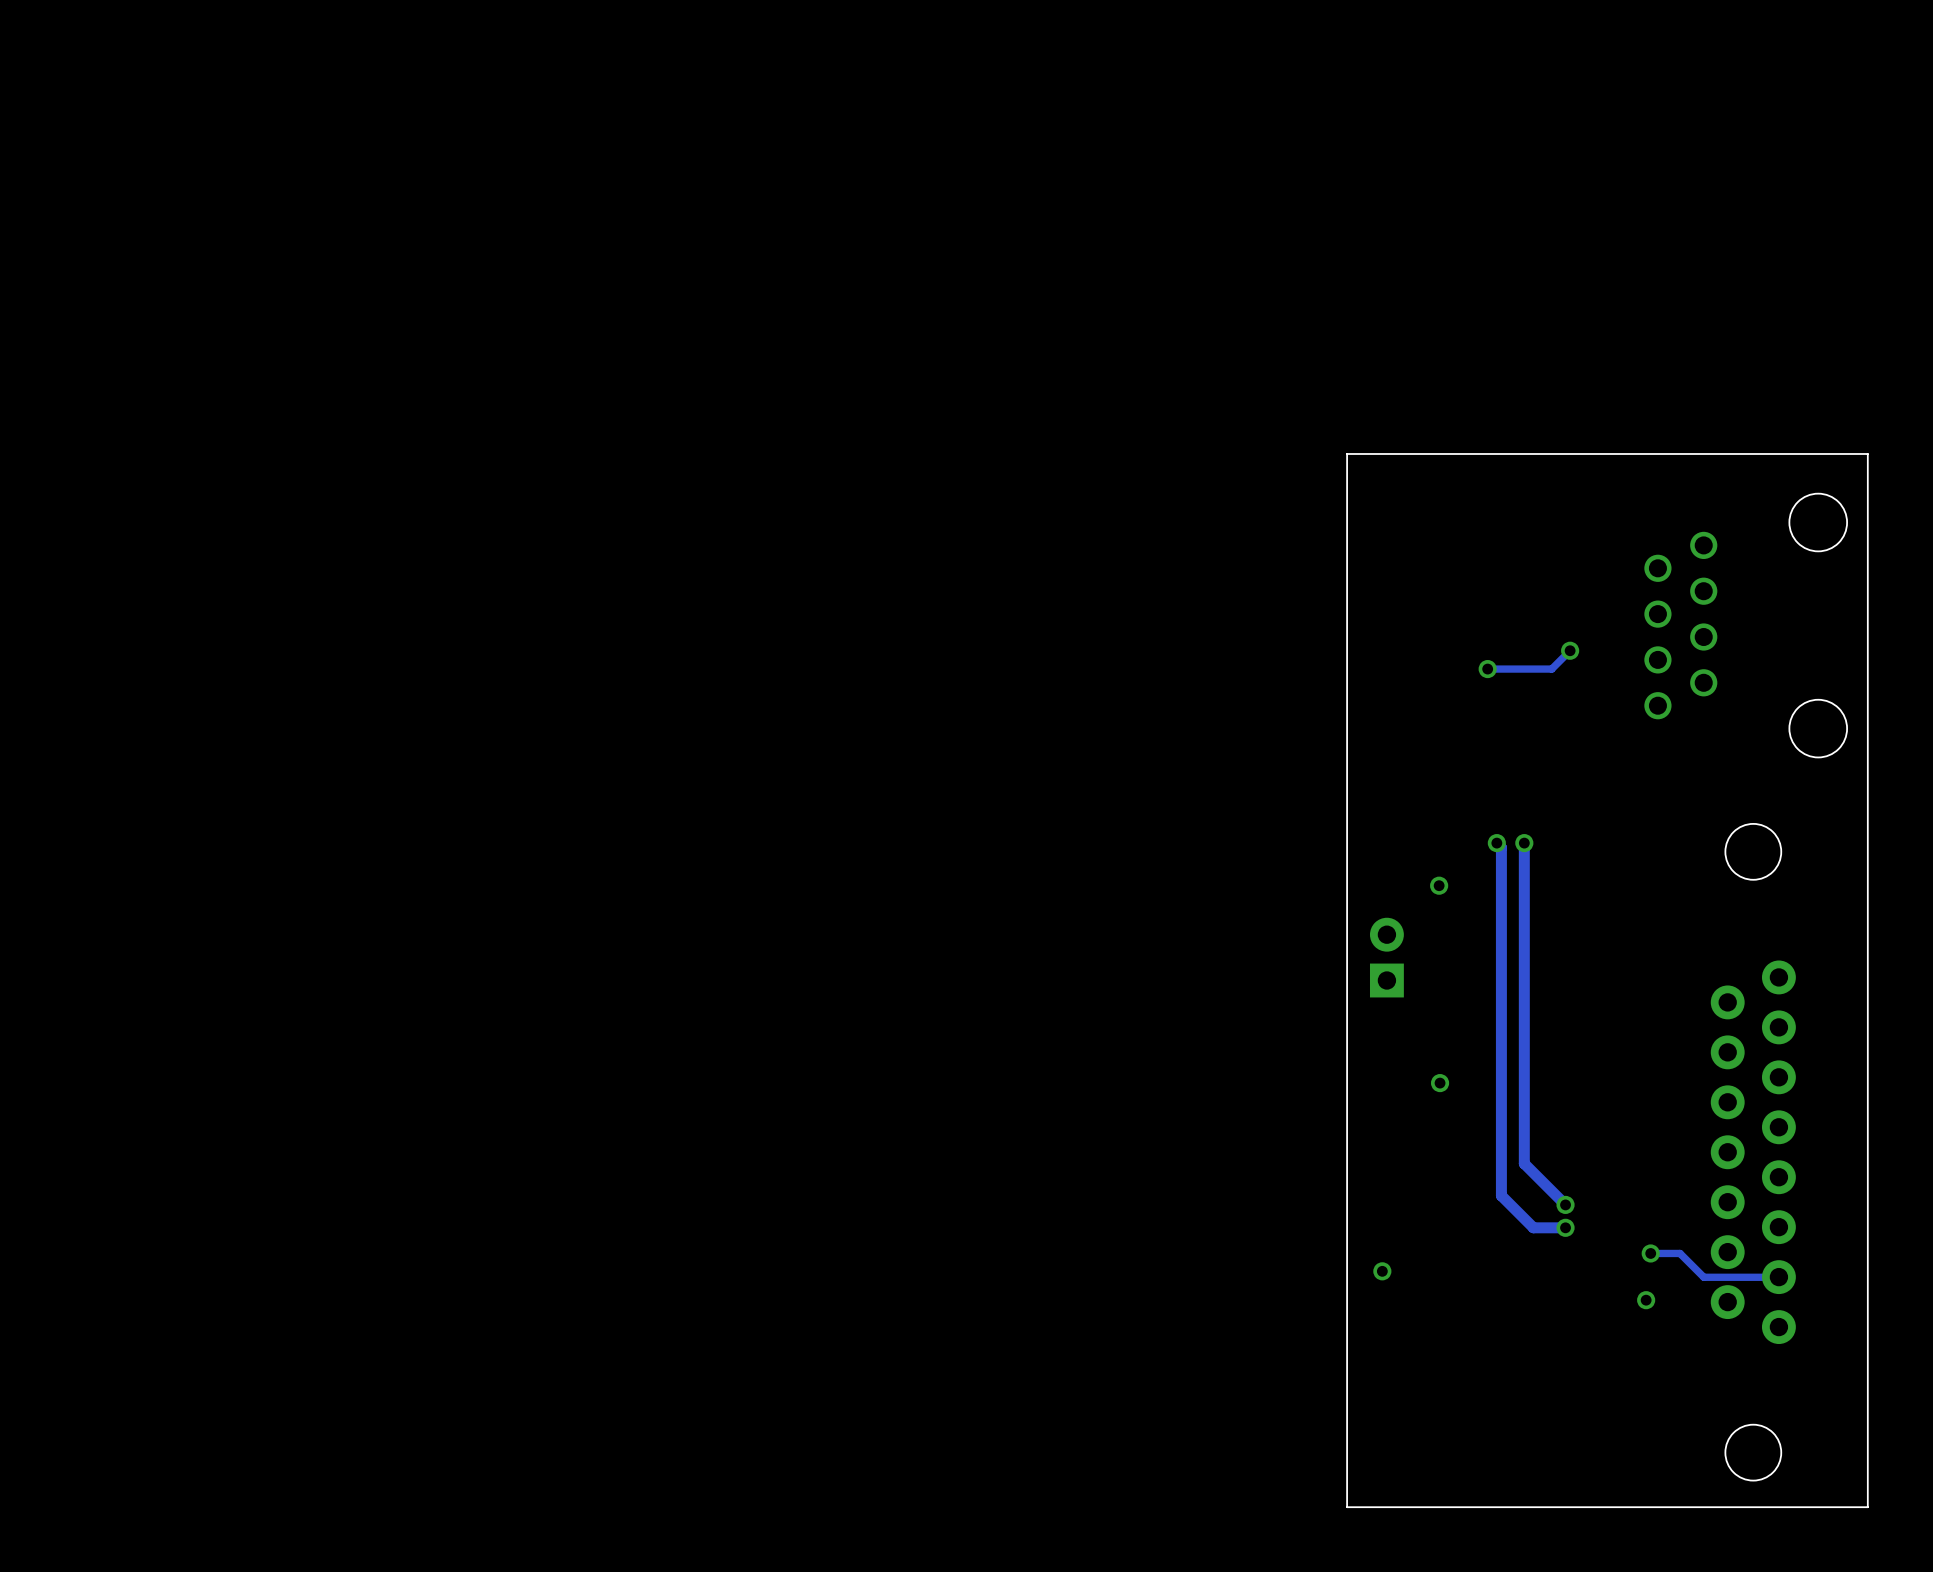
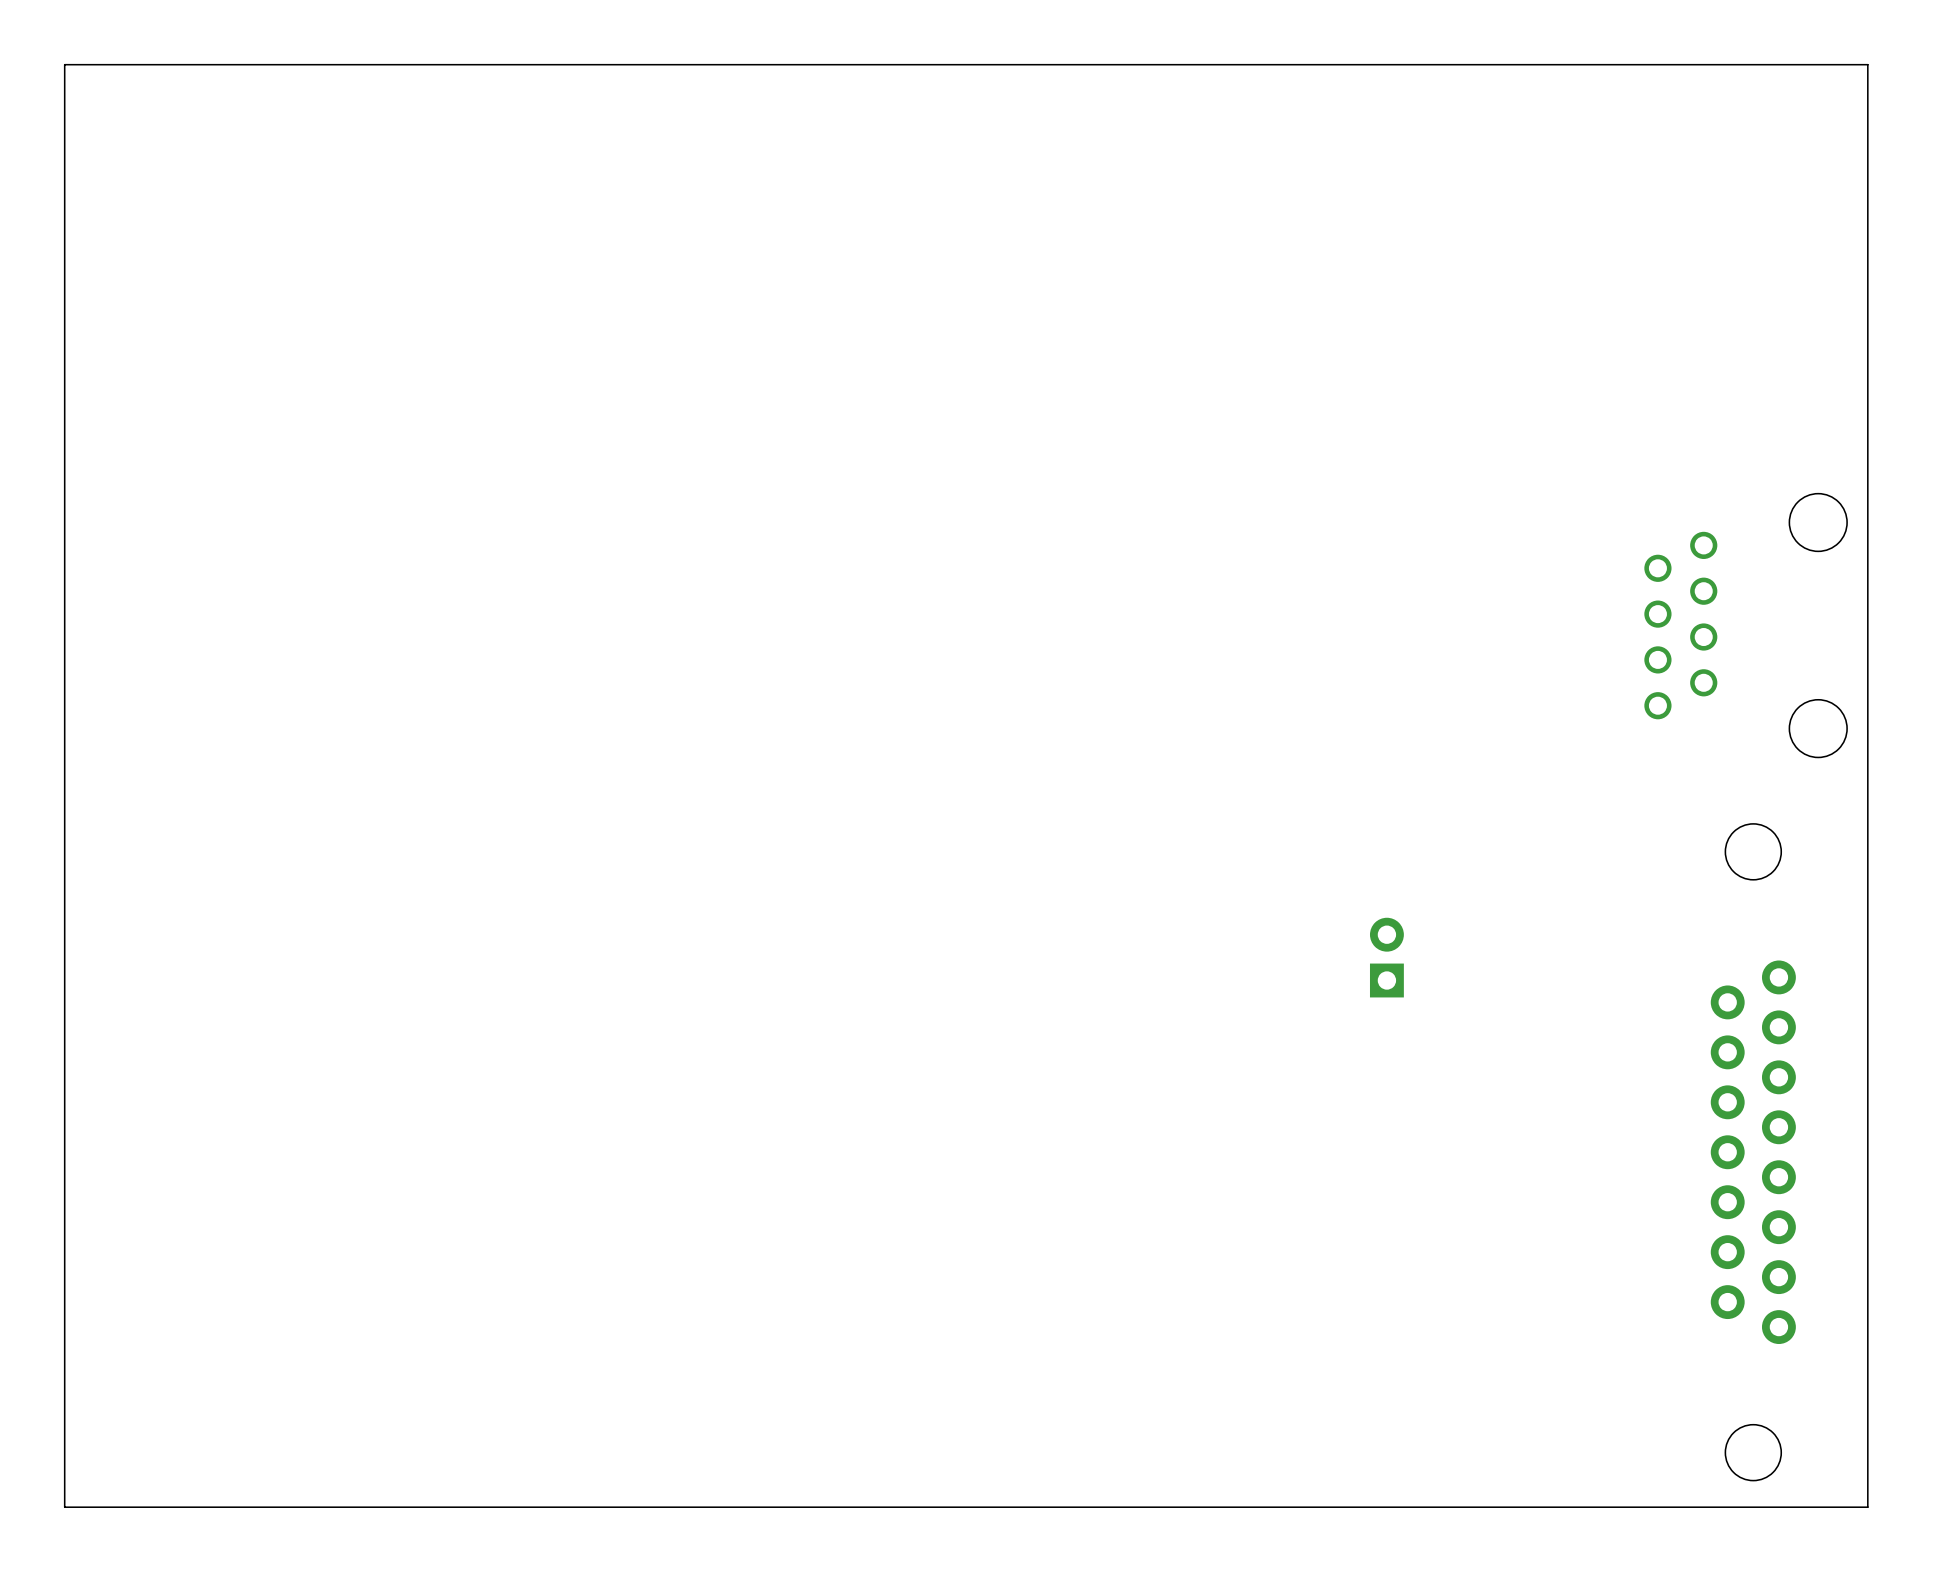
board edge: (1867, 453) (1347, 453) (1347, 1507) -> (1867, 453) (1867, 64) (64, 64) (64, 1507) (1347, 1507)
track: (1570, 650) (1551, 669) (1487, 669) -> none
via: (1570, 650) -> none
via: (1487, 669) -> none
track: (1496, 843) (1501, 847) (1501, 1195) (1533, 1227) (1565, 1227) -> none
via: (1496, 843) -> none
track: (1524, 843) (1524, 1163) (1565, 1204) -> none
via: (1524, 843) -> none
via: (1439, 885) -> none
via: (1440, 1083) -> none
via: (1565, 1204) -> none
via: (1565, 1227) -> none
track: (1650, 1253) (1680, 1253) (1703, 1277) (1778, 1277) -> none
via: (1650, 1253) -> none
via: (1382, 1271) -> none
via: (1646, 1300) -> none

